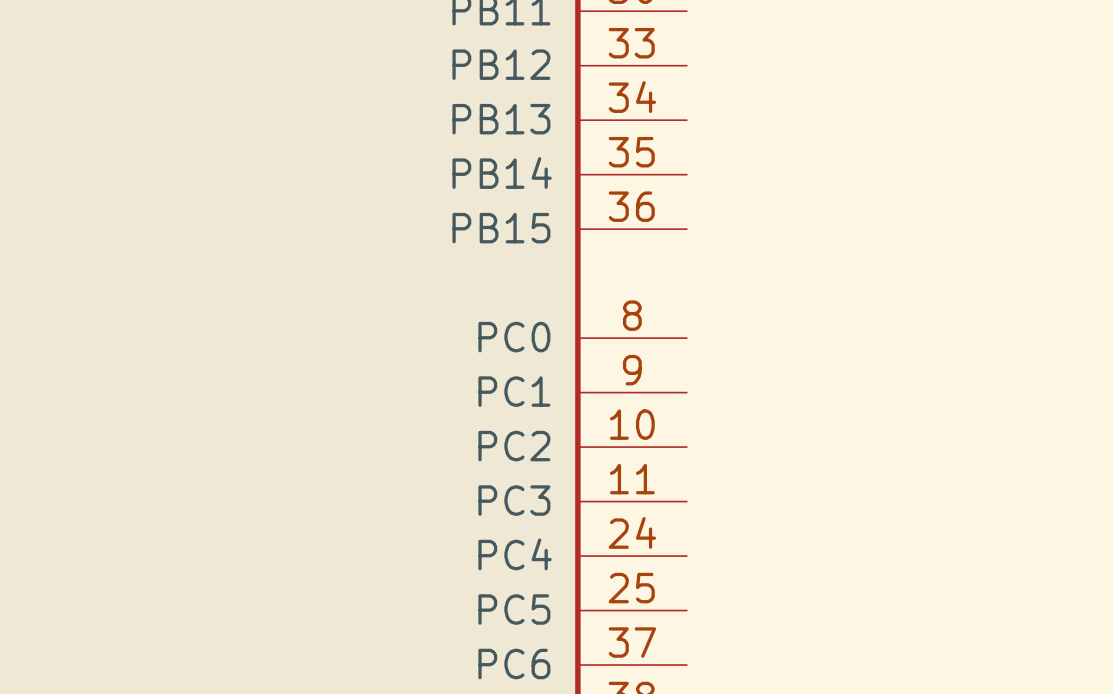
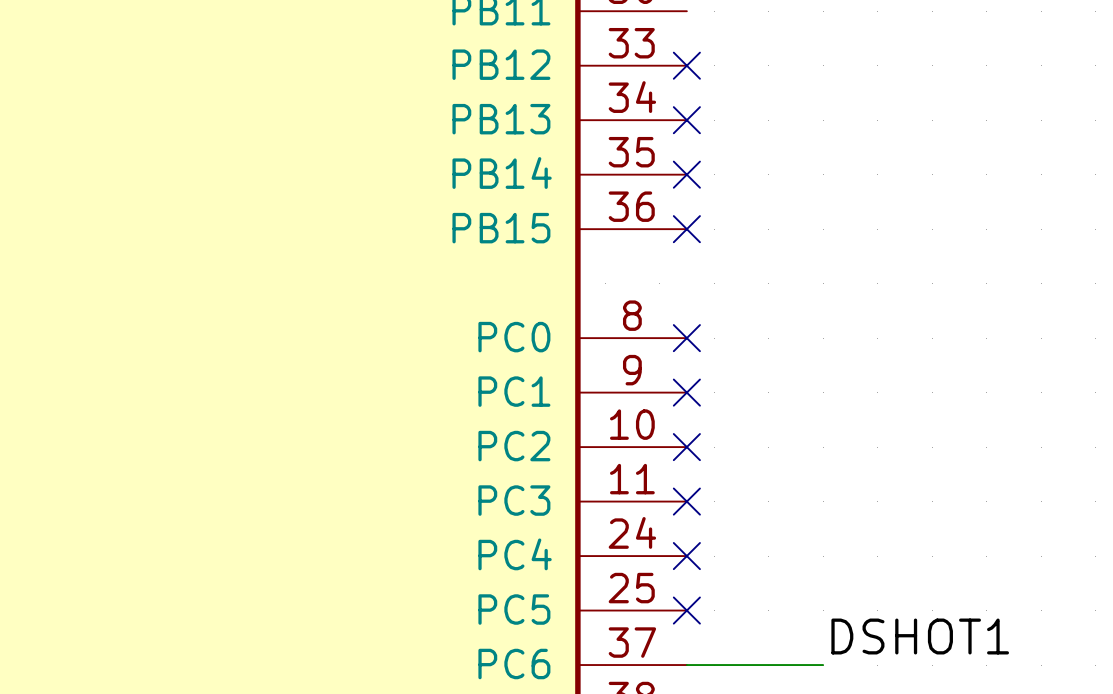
no-connect mark: none -> (686, 65)
no-connect mark: none -> (686, 120)
no-connect mark: none -> (686, 174)
no-connect mark: none -> (686, 229)
no-connect mark: none -> (686, 338)
no-connect mark: none -> (686, 392)
no-connect mark: none -> (686, 447)
no-connect mark: none -> (686, 501)
no-connect mark: none -> (686, 556)
no-connect mark: none -> (686, 610)
label: none -> DSHOT1 (920, 636)
wire: none -> (686, 665) (823, 665)

